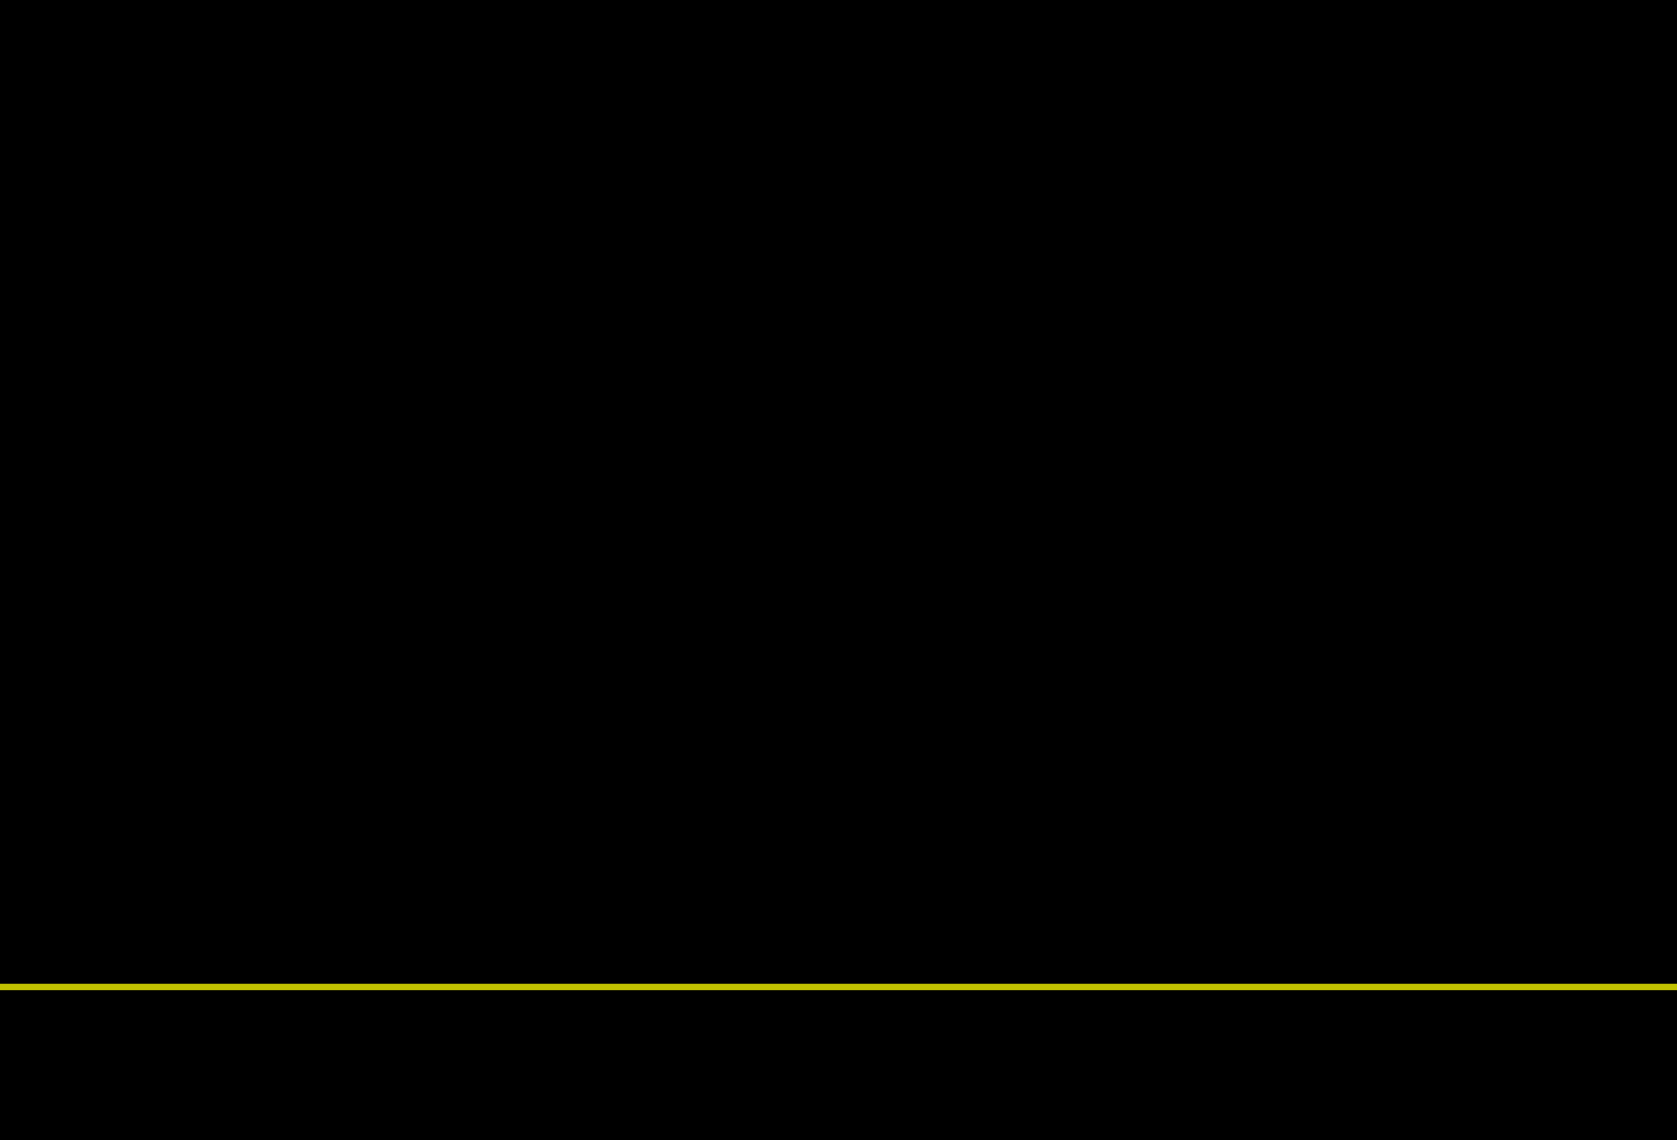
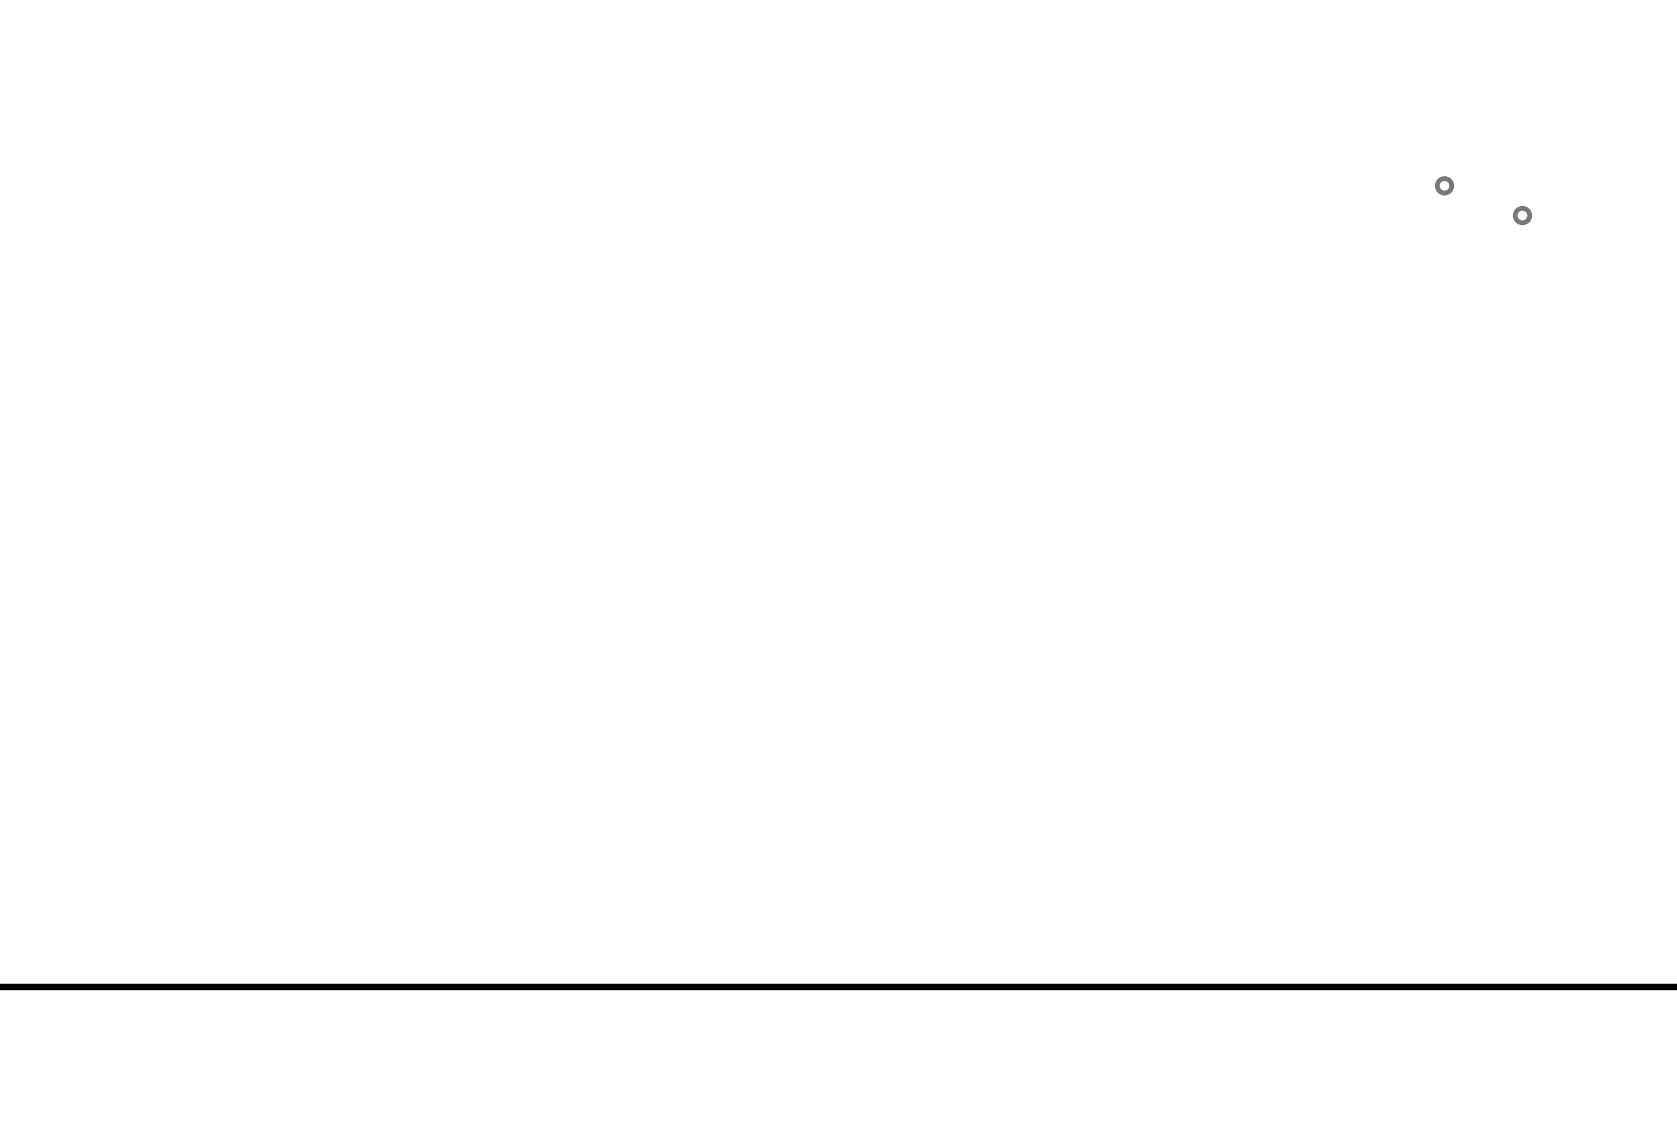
via: none -> (1444, 185)
via: none -> (1522, 215)

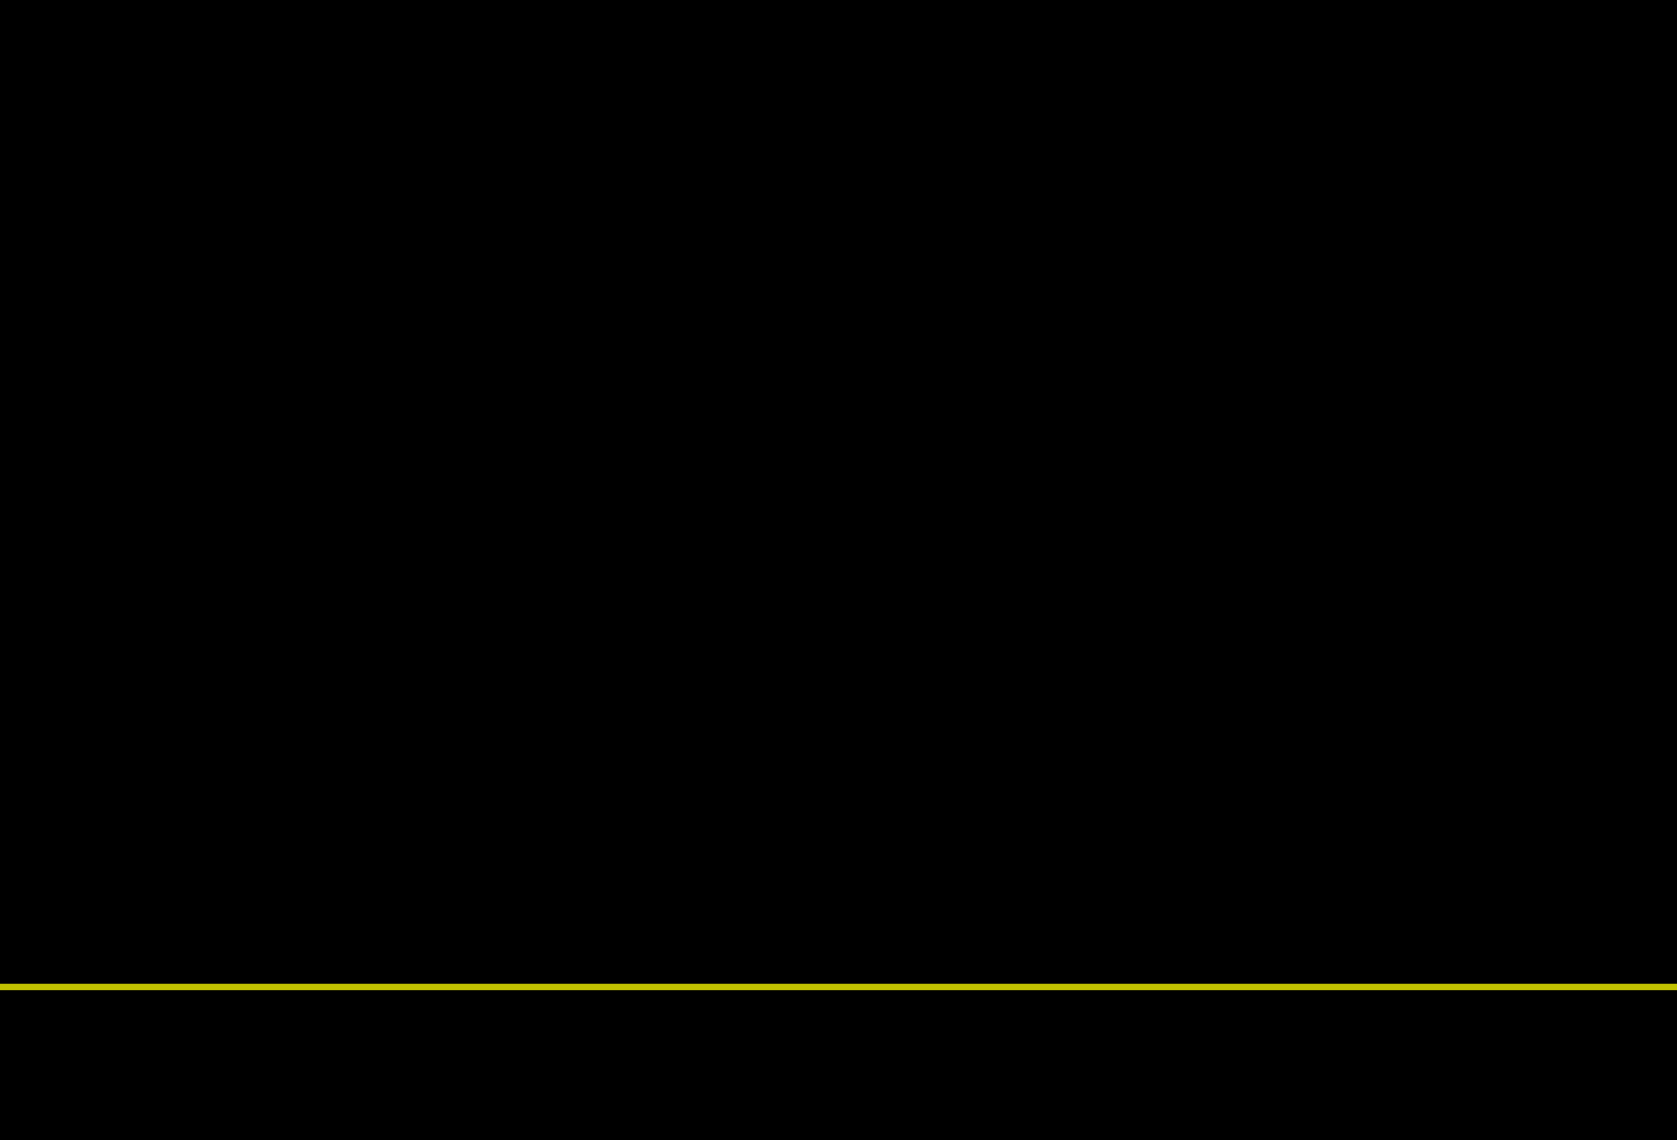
via: (1444, 185) -> none
via: (1522, 215) -> none

